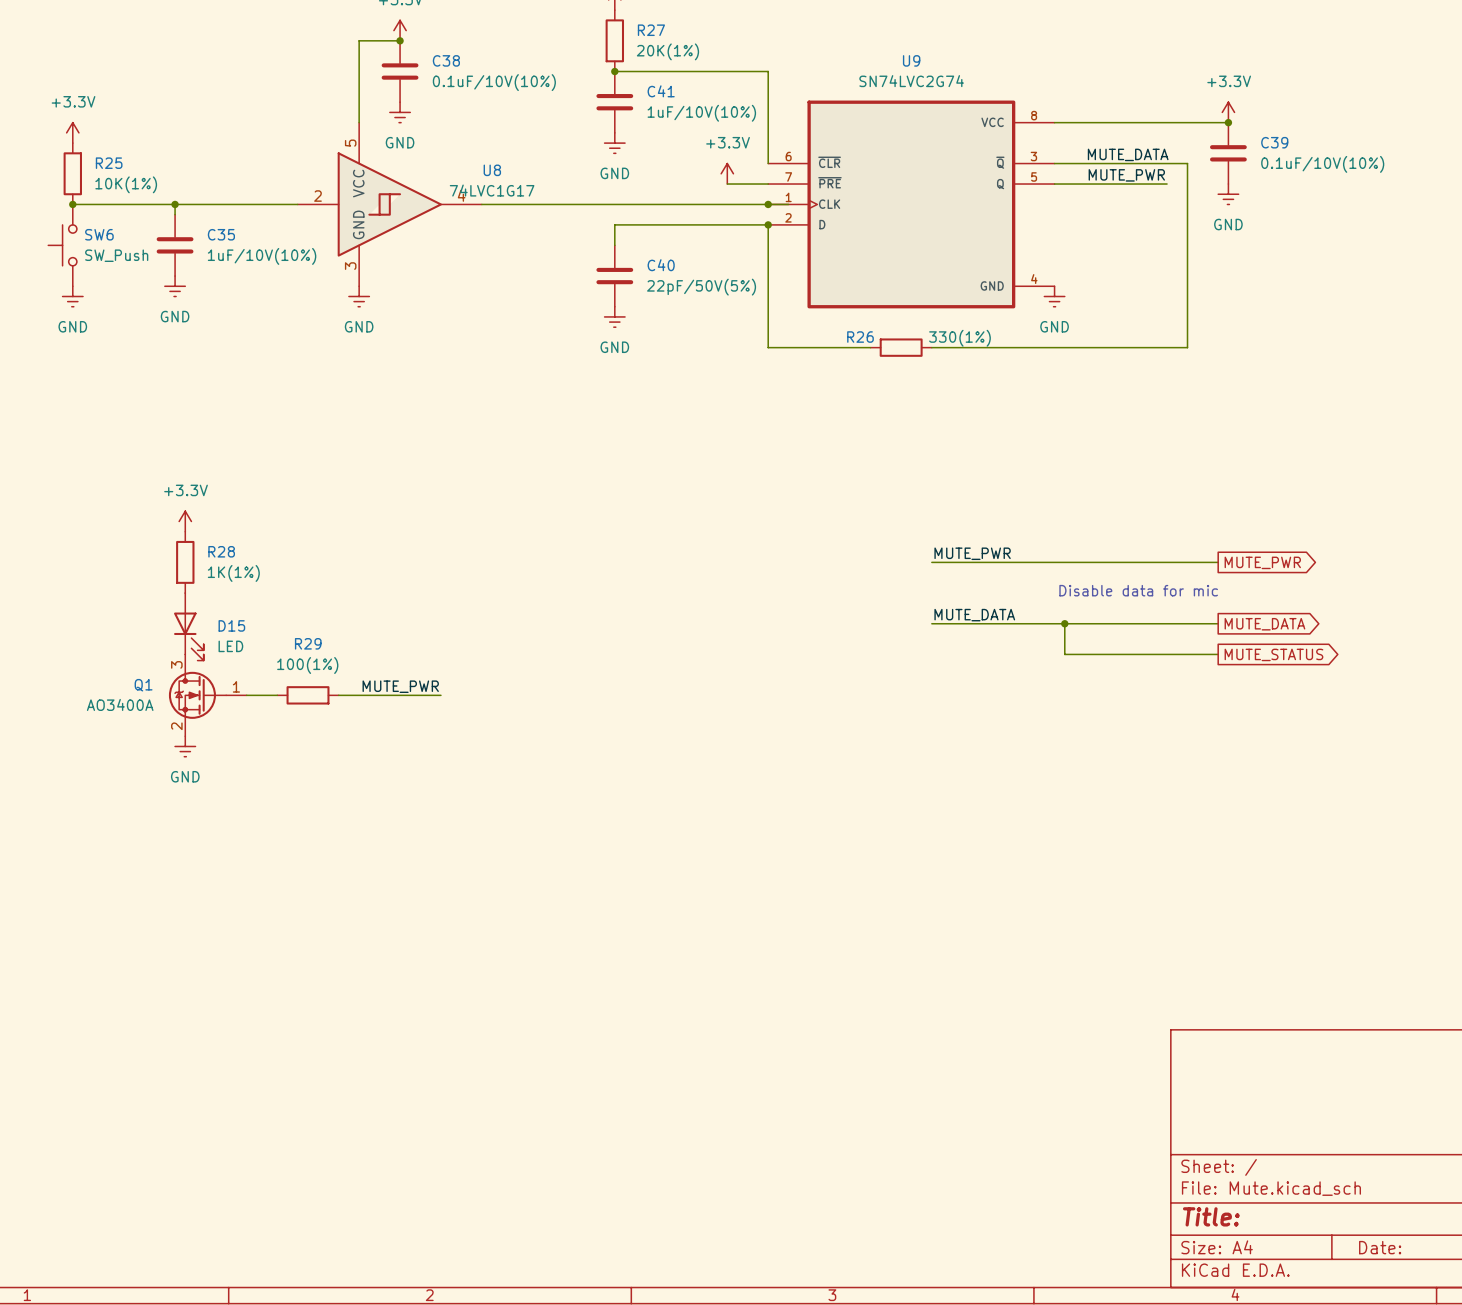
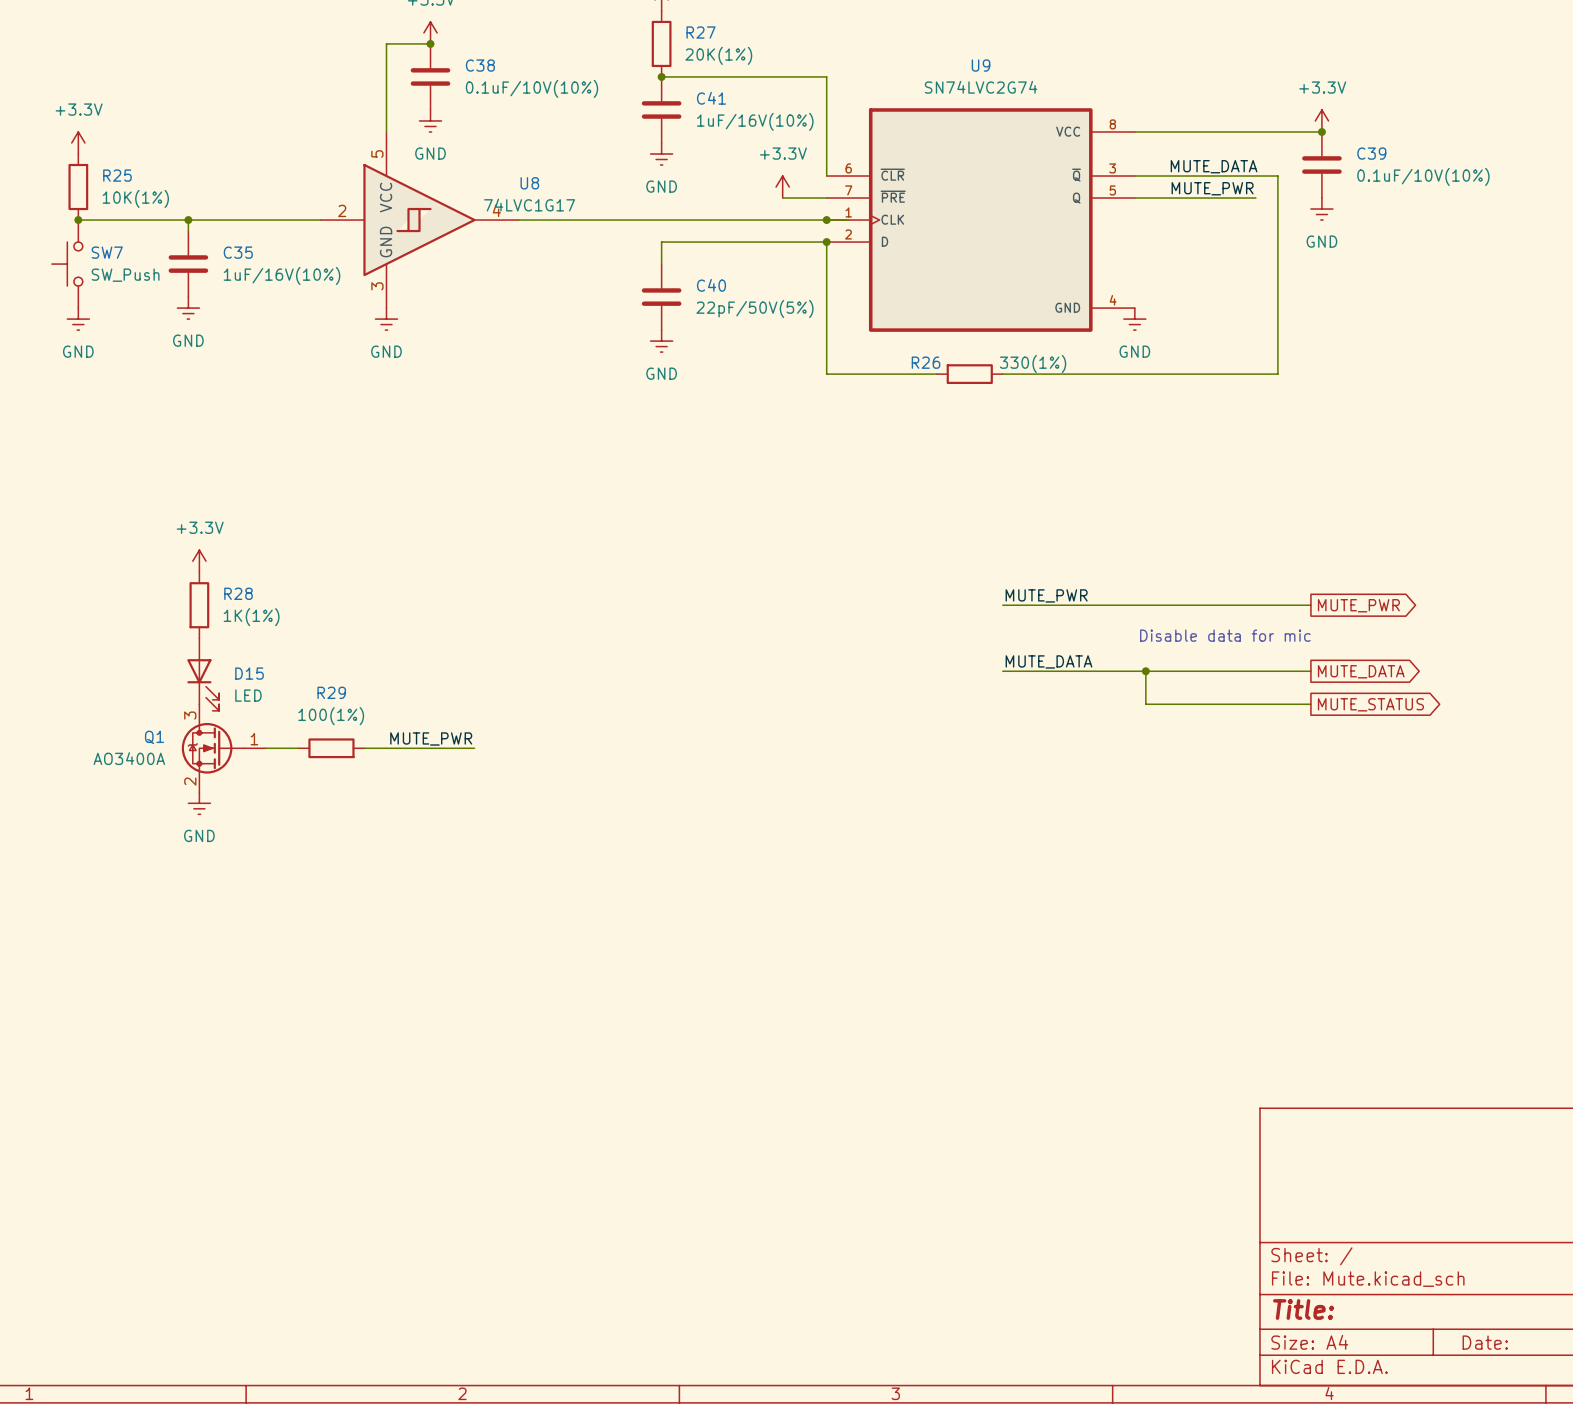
C41 value: 1uF/10V(10%) (701, 113) -> 1uF/16V(10%) (755, 121)
SW6 name: SW6 (99, 234) -> SW7 (107, 252)
C35 value: 1uF/10V(10%) (262, 256) -> 1uF/16V(10%) (282, 275)

